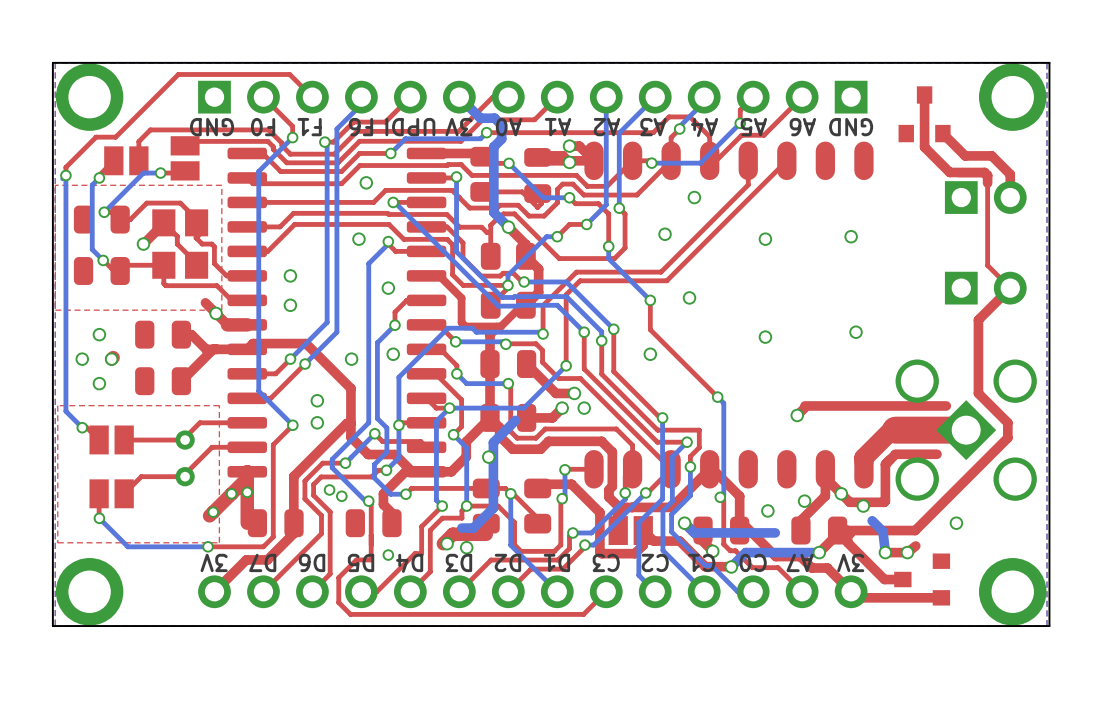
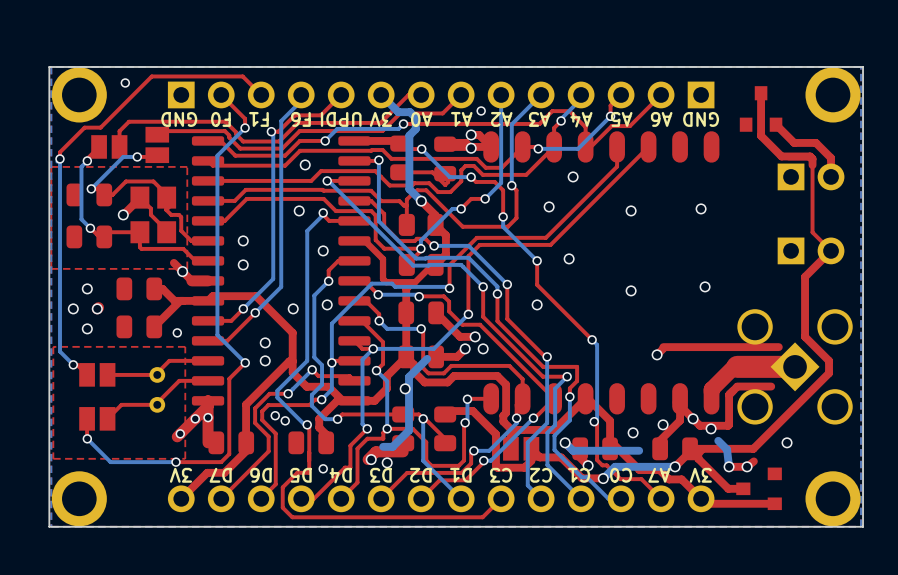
via: none -> (125, 82)
via: none -> (481, 110)
via: none -> (177, 332)

